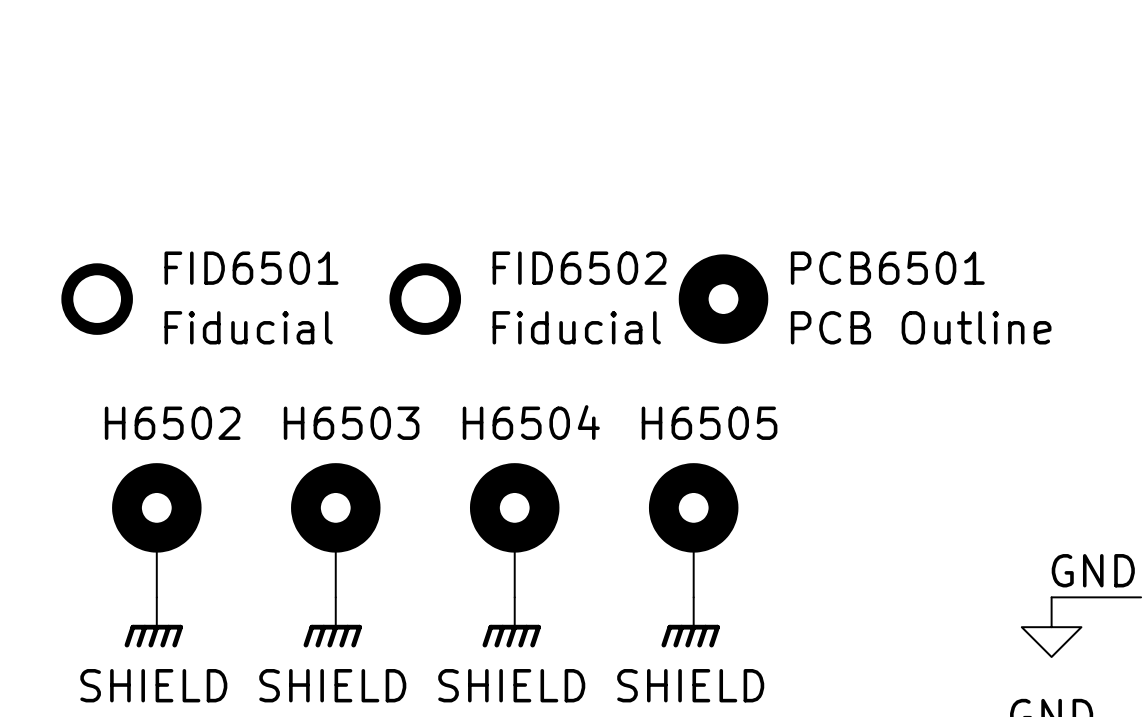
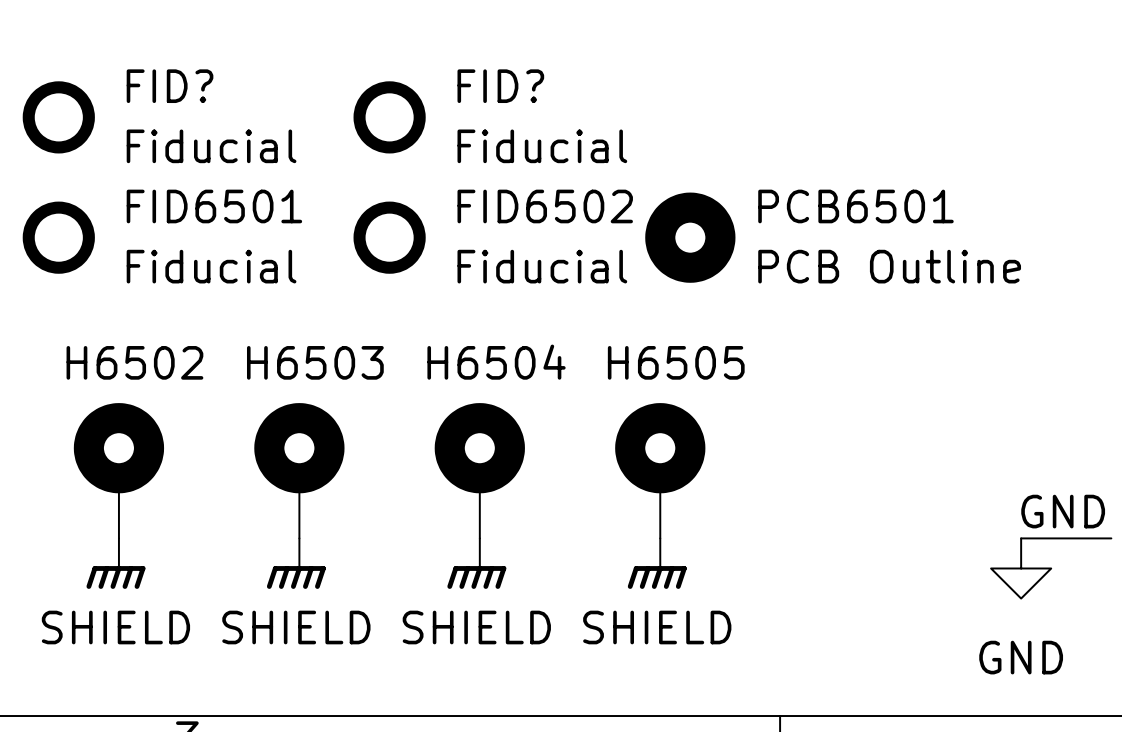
FID?: none -> Fiducial (58, 117)
FID?: none -> Fiducial (389, 117)

